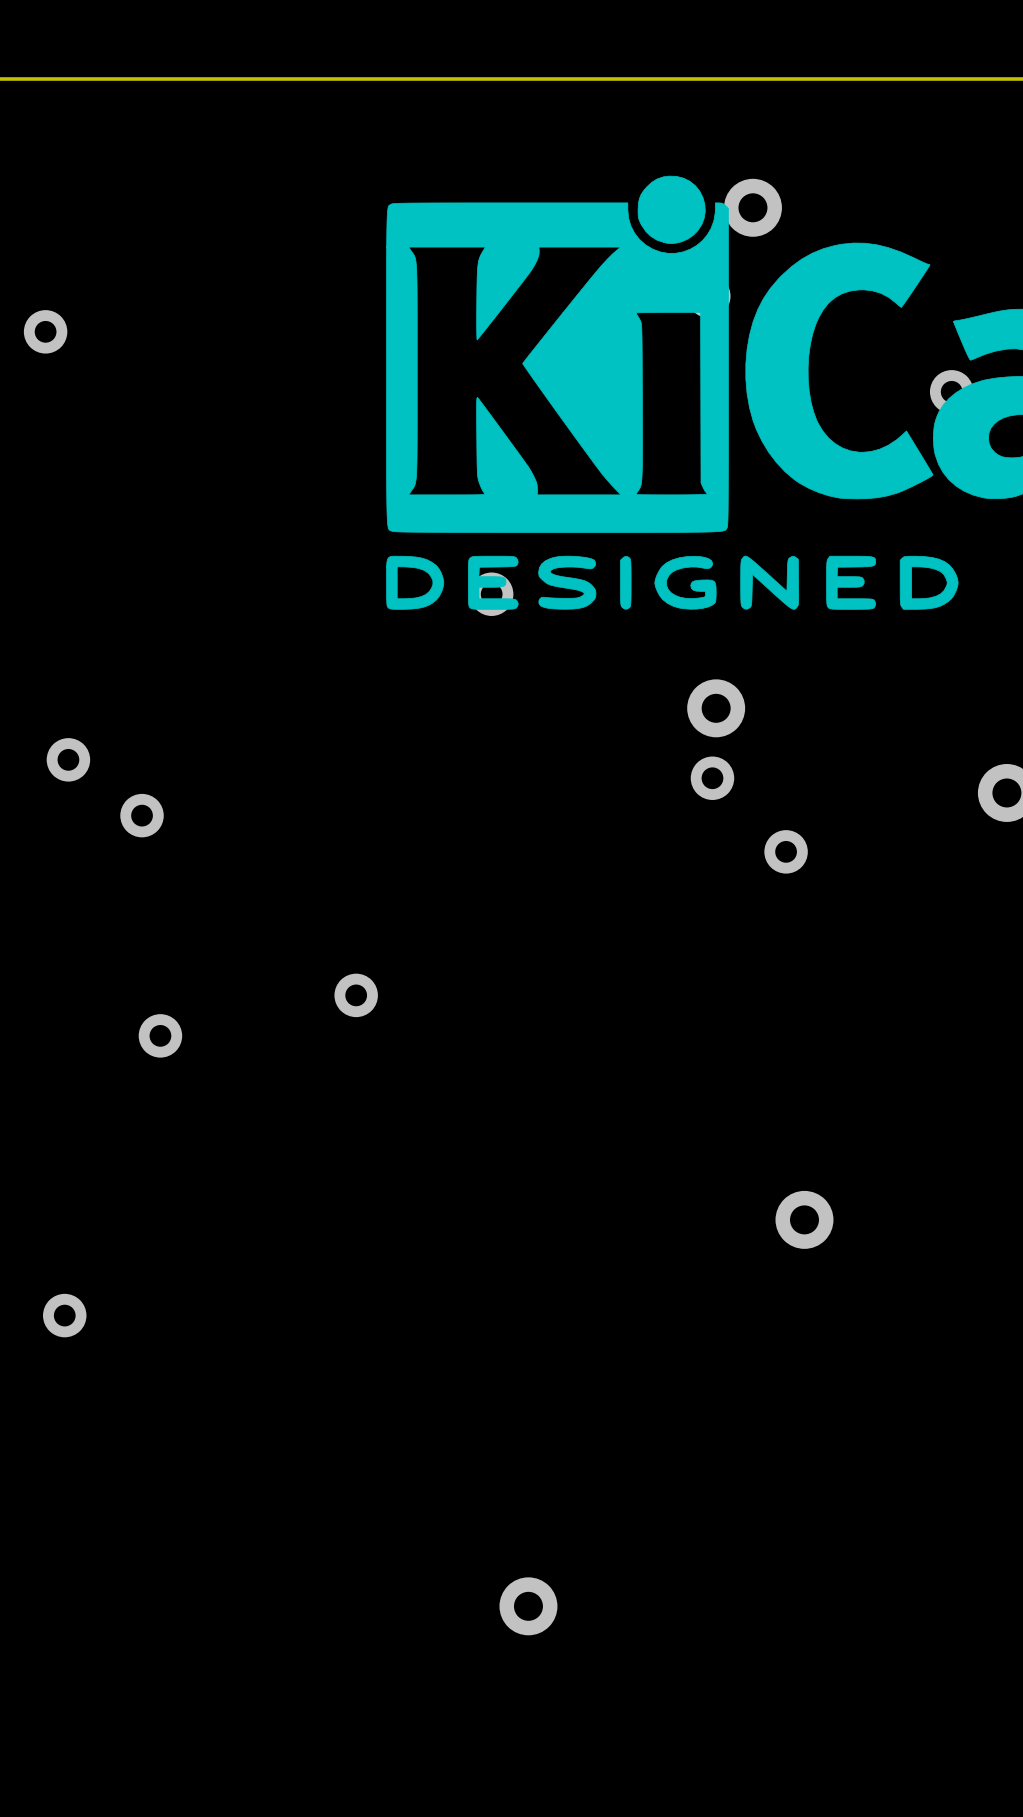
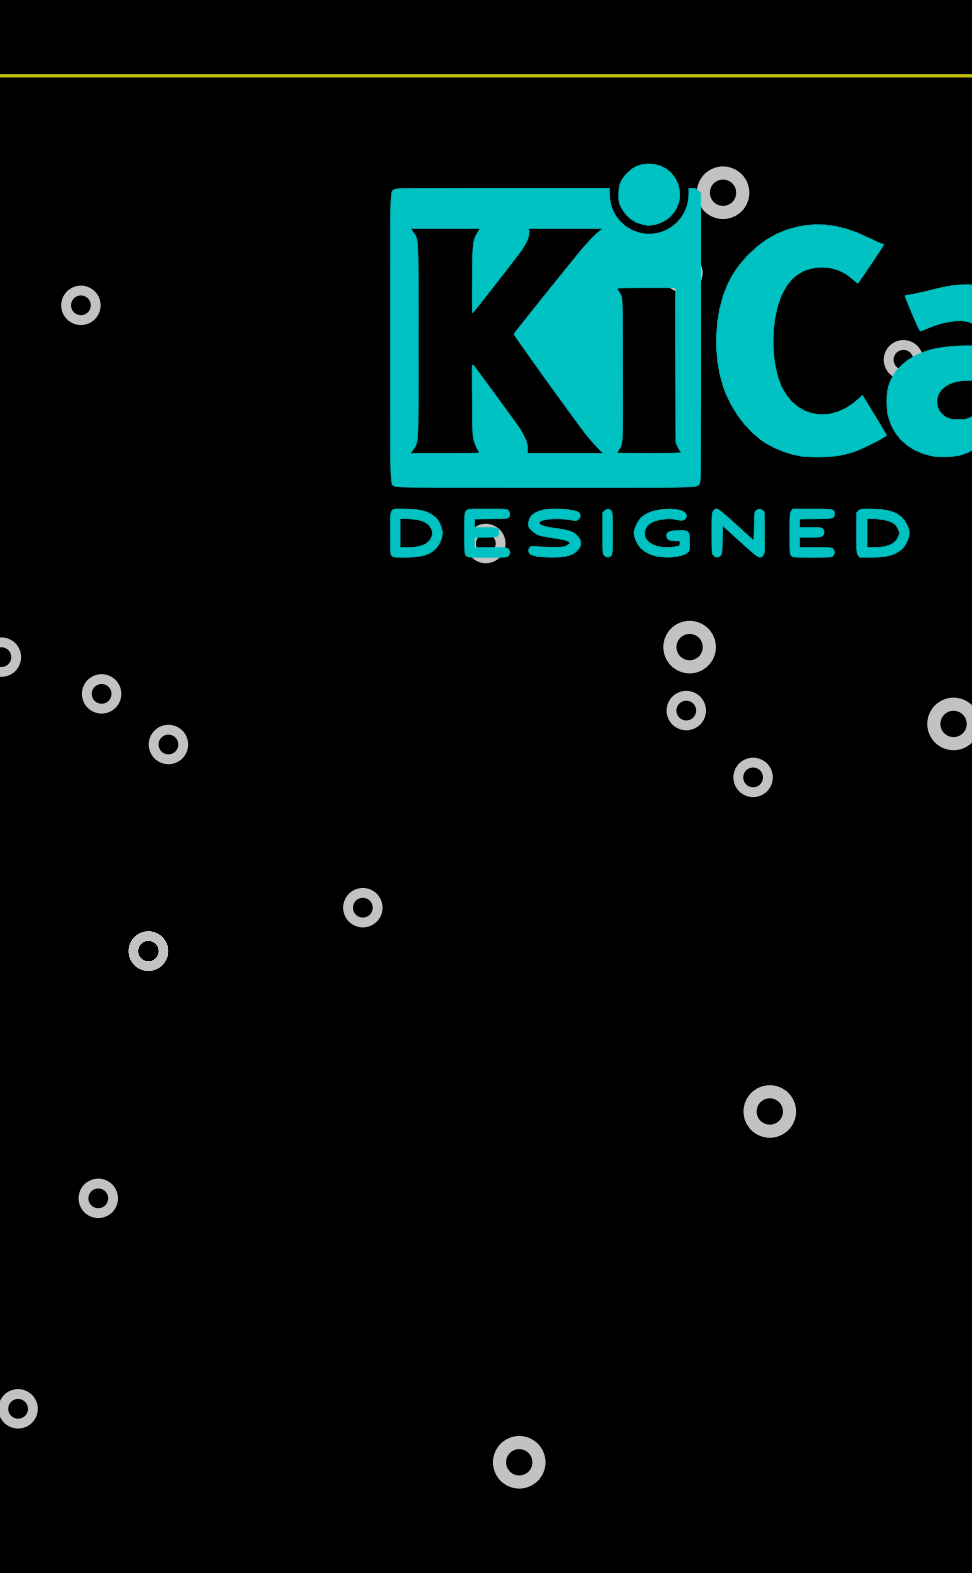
via position: (160, 1035) -> (148, 951)

